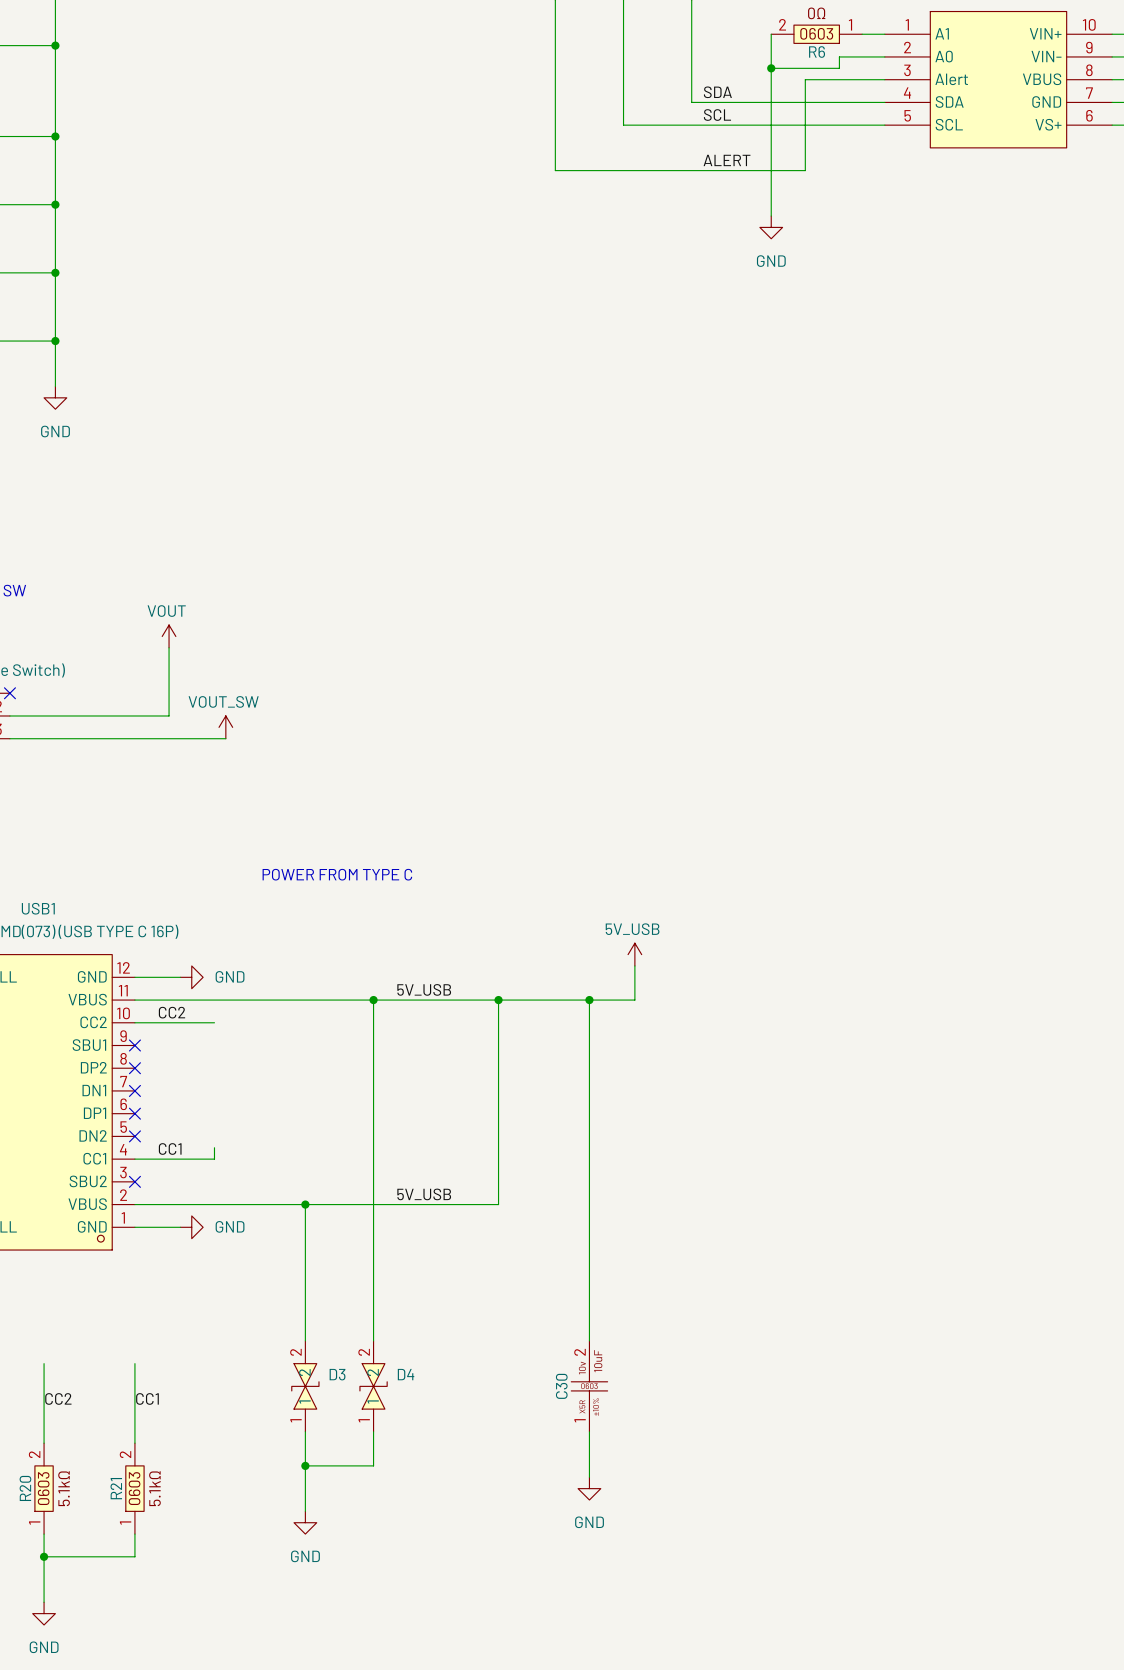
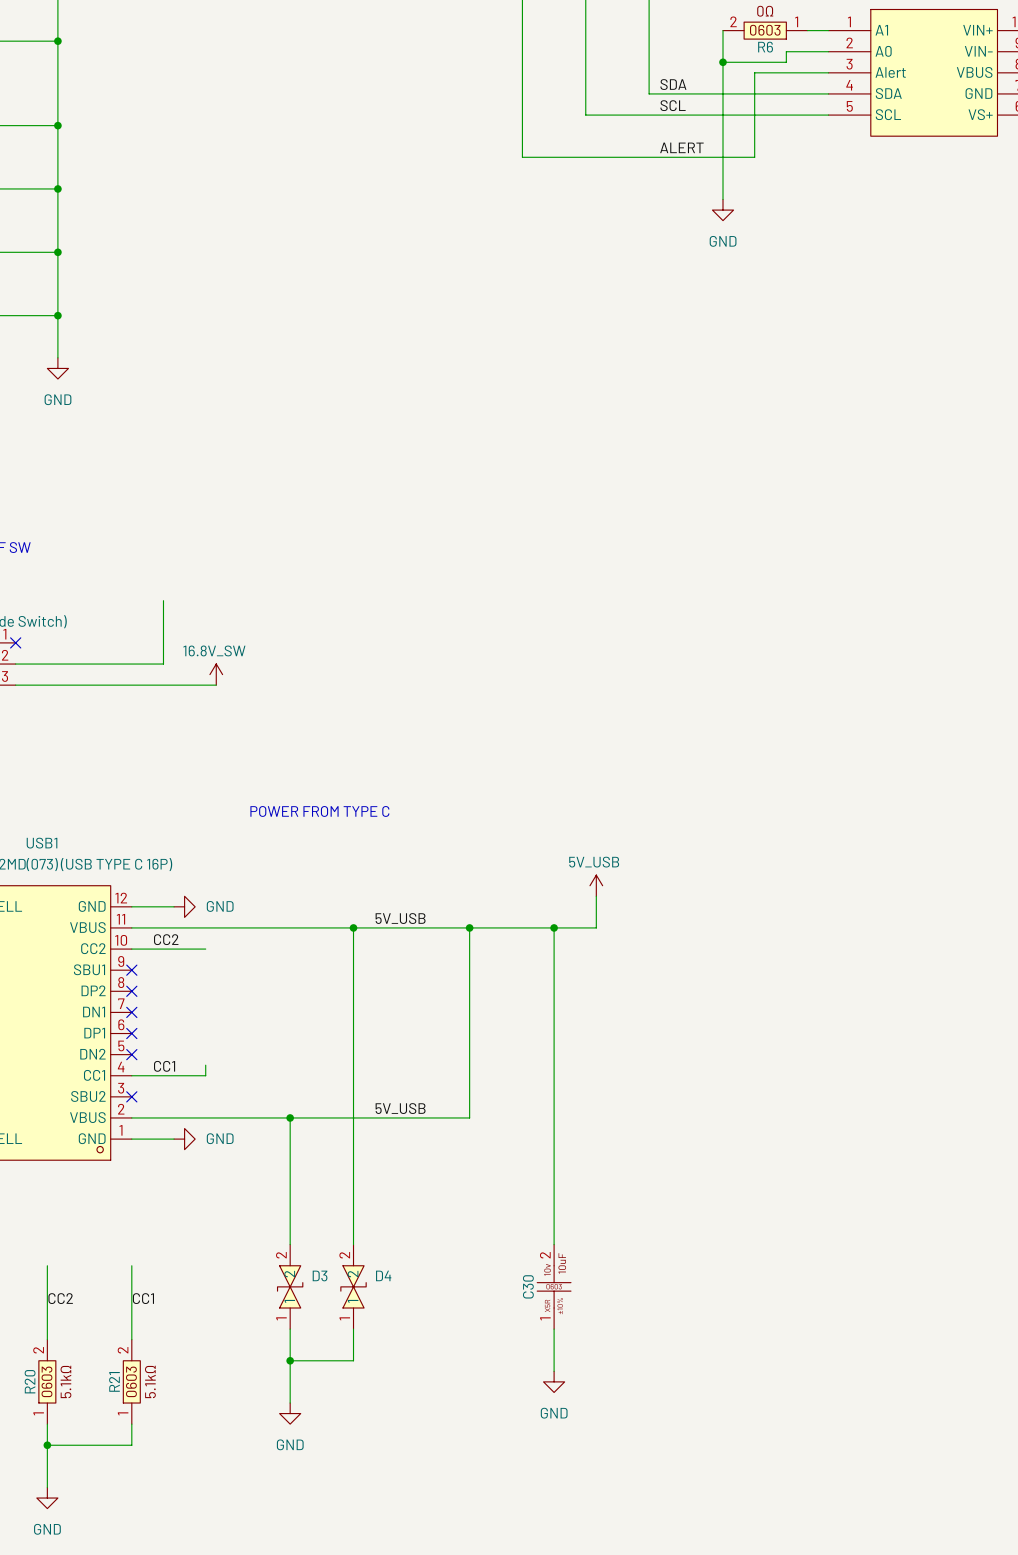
power symbol: VOUT (169, 636) -> none
power symbol: VOUT_SW (225, 727) -> 16.8V_SW (216, 674)

